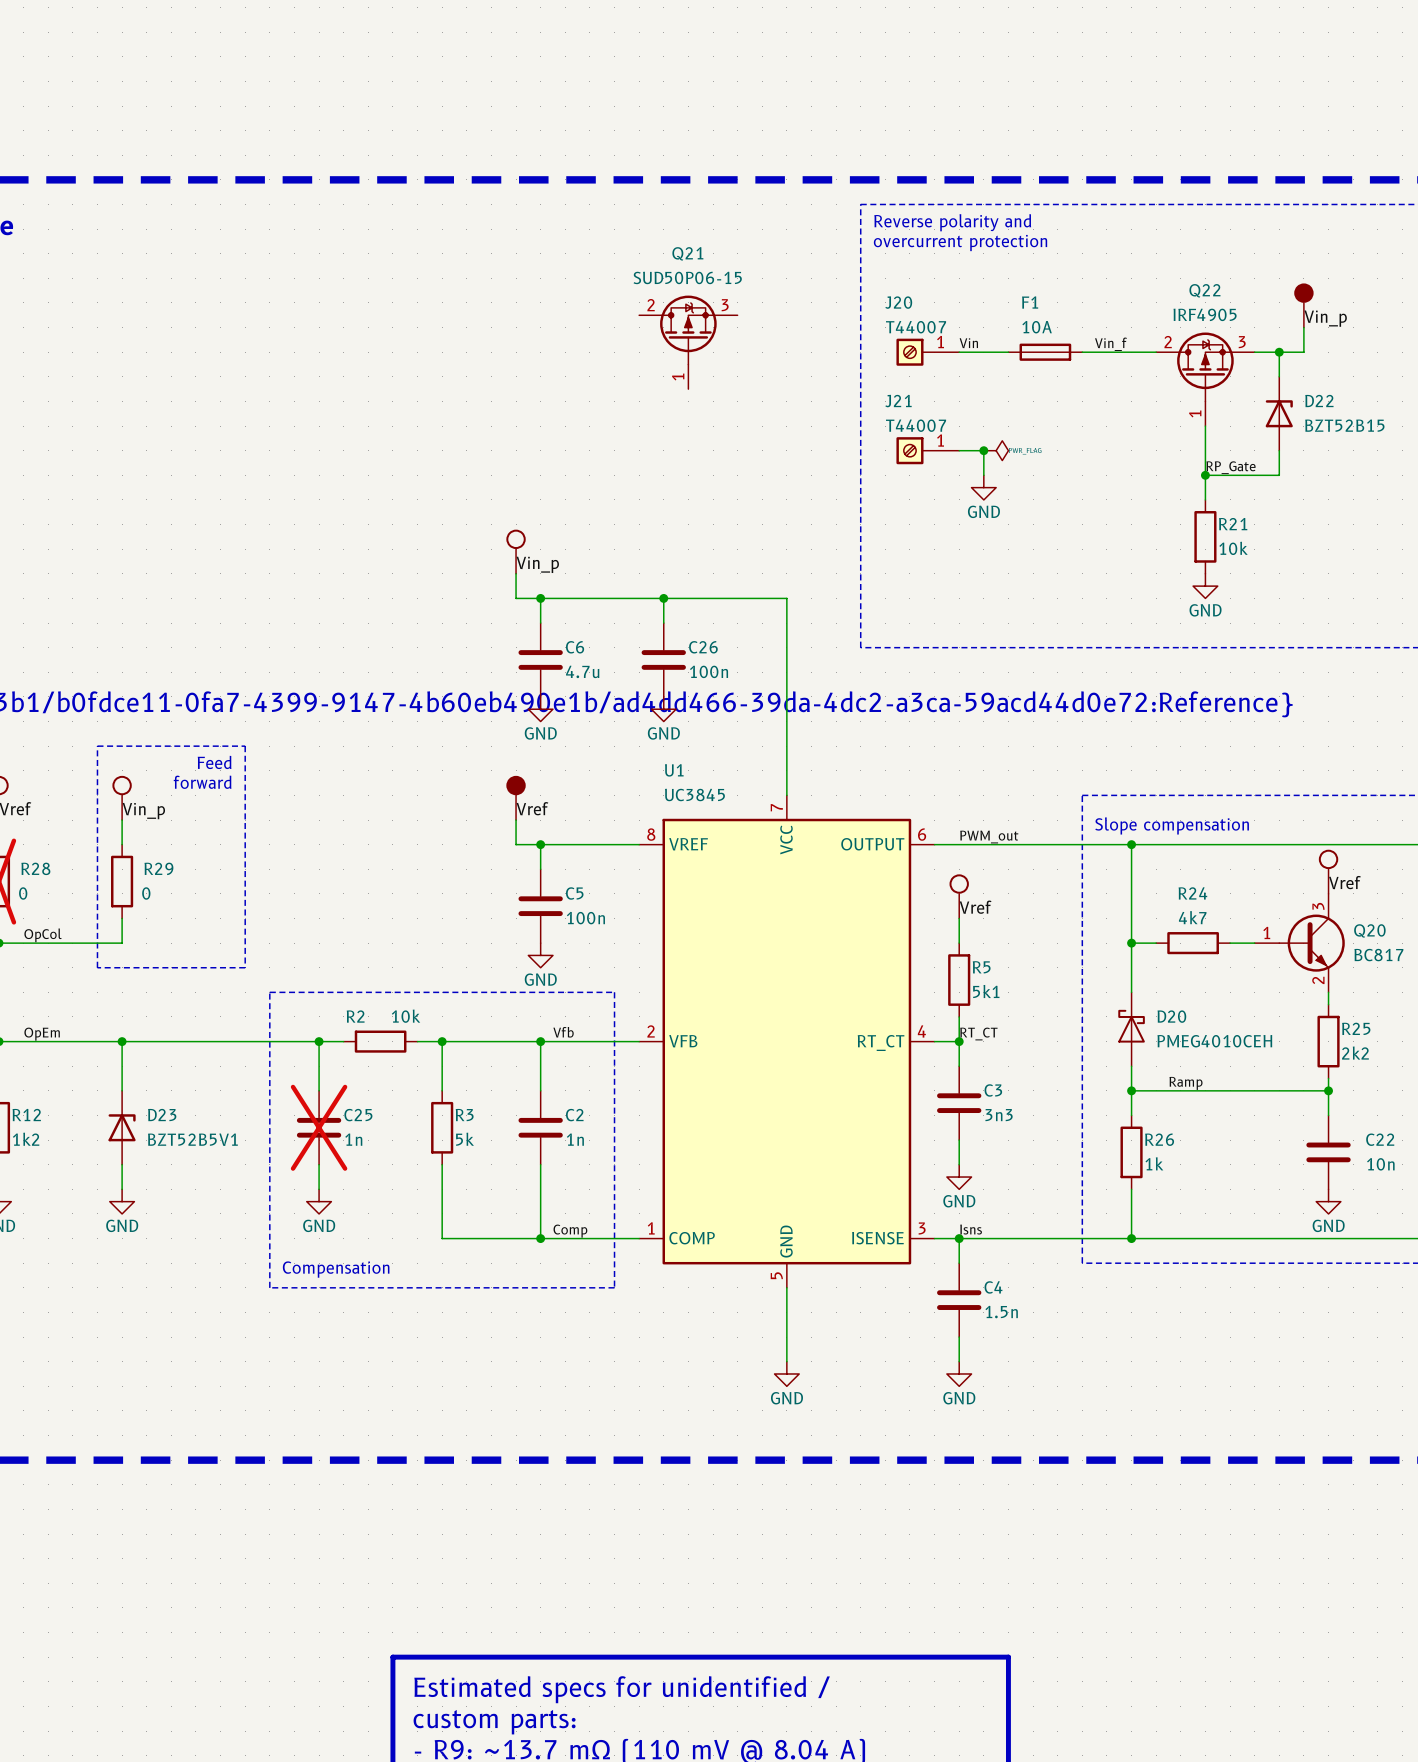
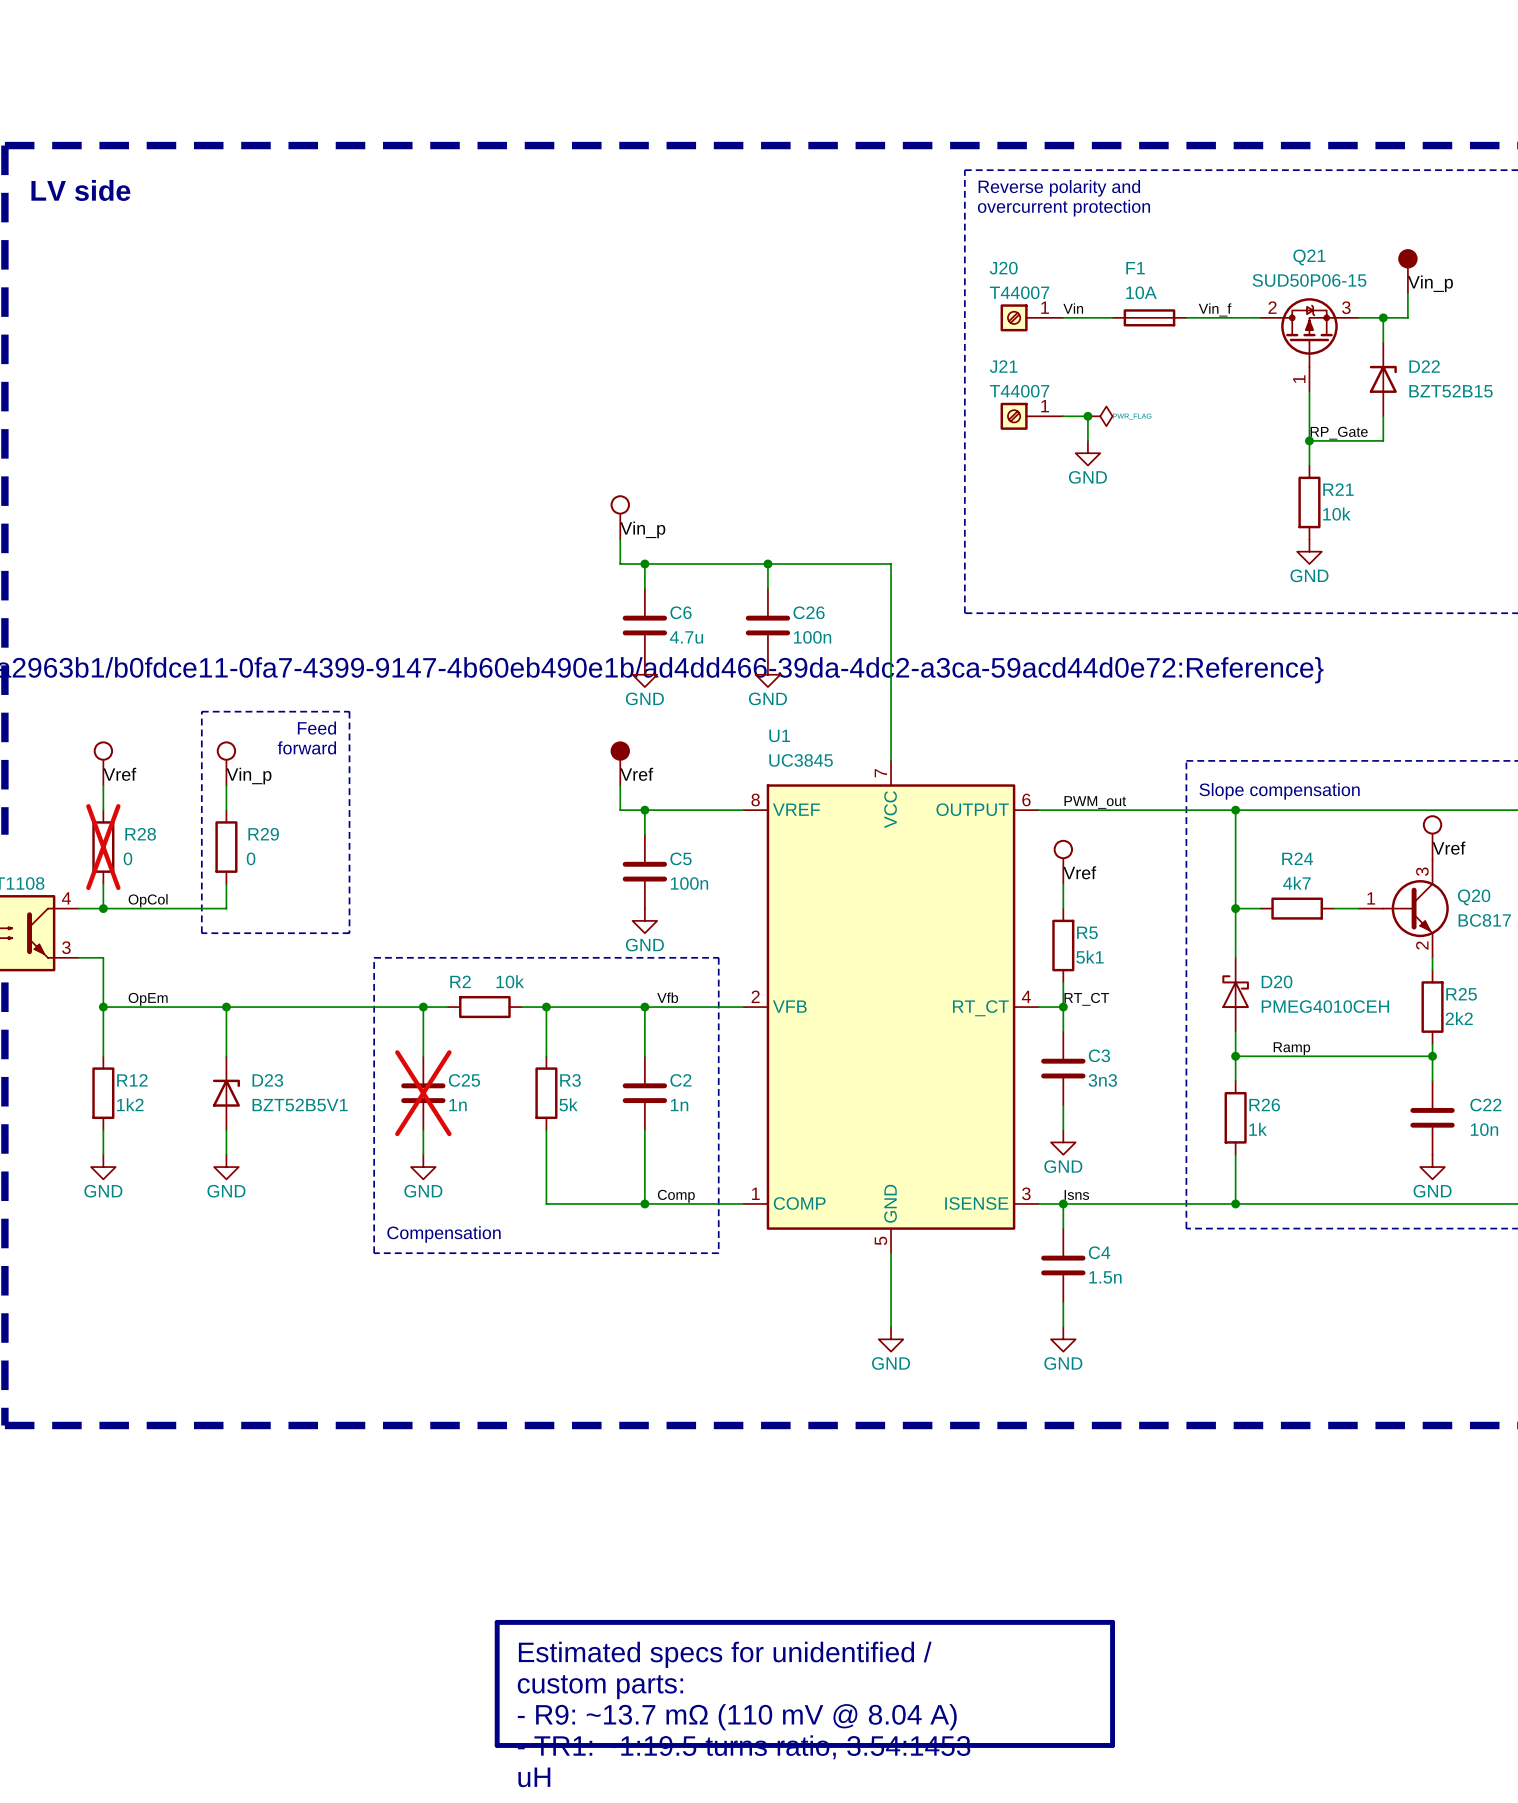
Q22 name: Q22 (1204, 290) -> Q21 (1309, 257)
Q22 value: IRF4905 (1205, 314) -> SUD50P06-15 (1309, 280)
Q21: SUD50P06-15 (688, 342) -> none

